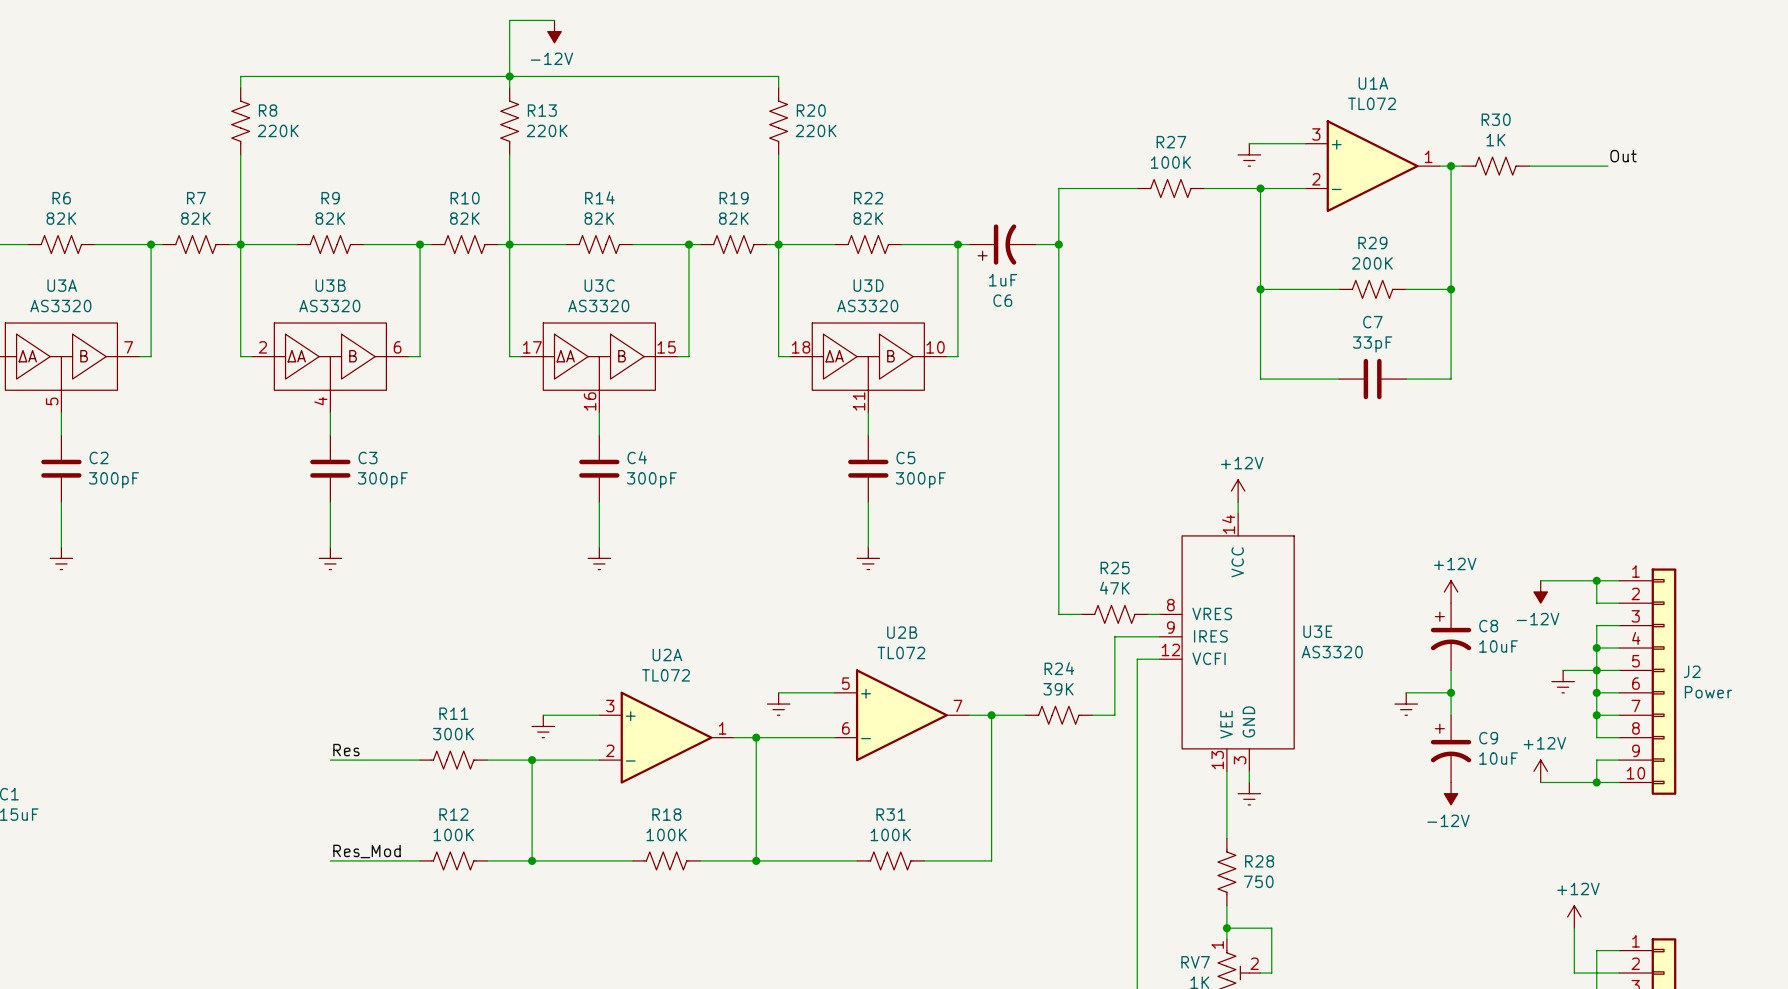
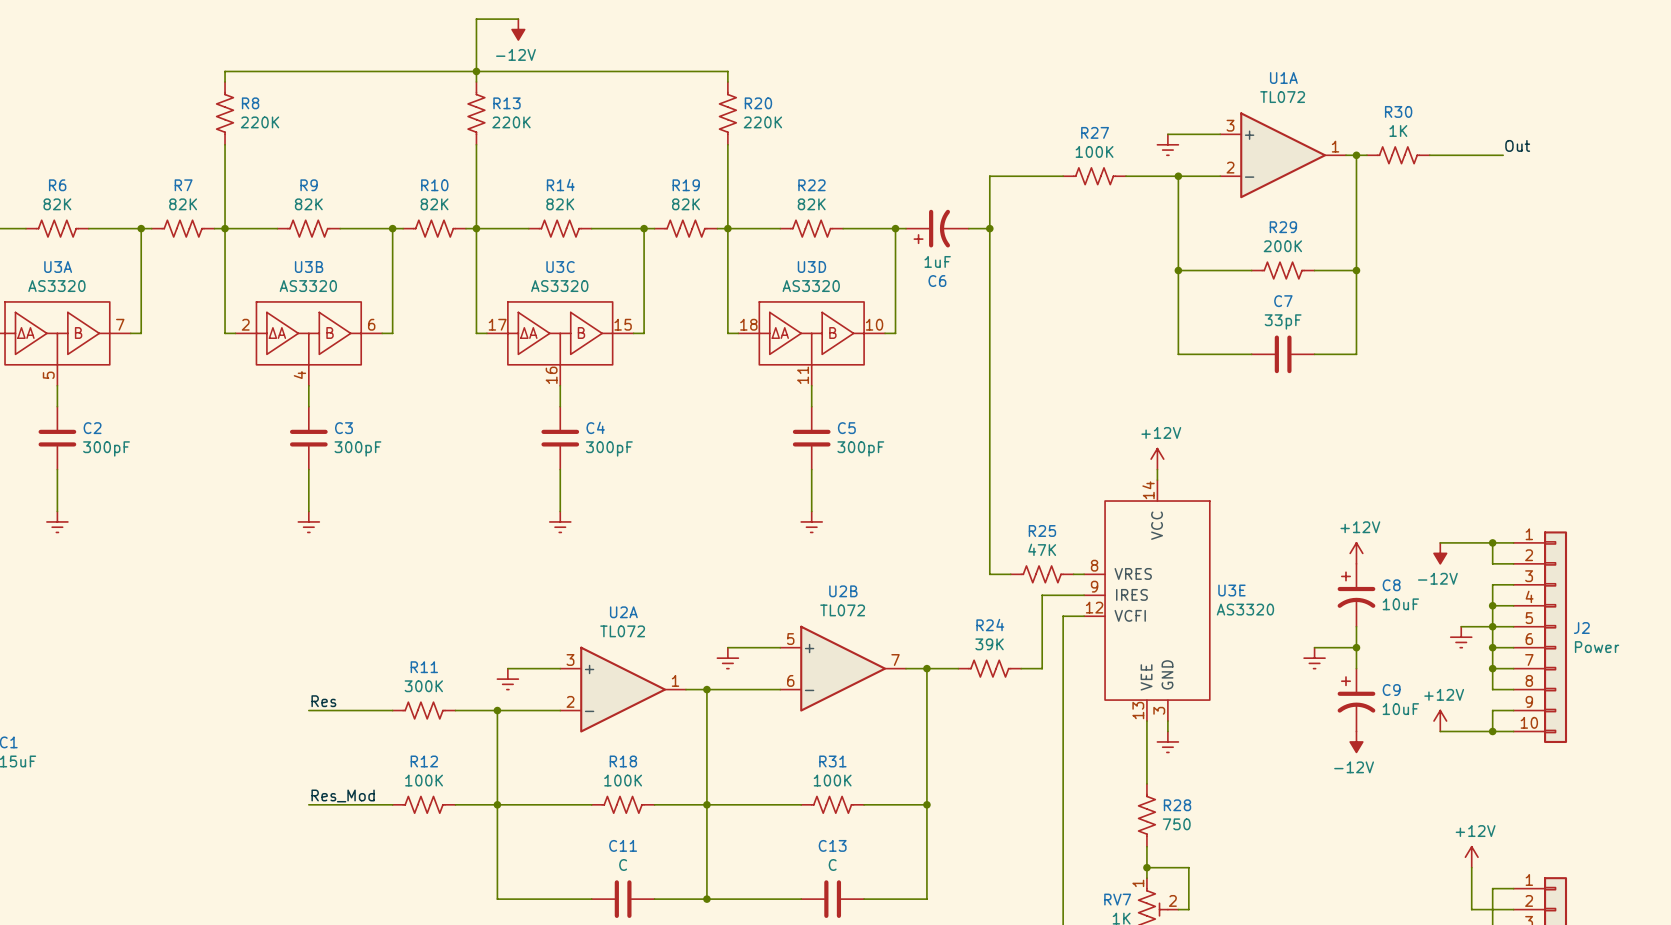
wire: none -> (497, 804) (497, 899) (591, 899)
wire: none -> (706, 804) (706, 899)
wire: none -> (926, 804) (926, 899) (864, 899)
junction: none -> (926, 804)
C11: none -> C (623, 899)
wire: none -> (654, 899) (801, 899)
junction: none -> (706, 899)
C13: none -> C (832, 899)

